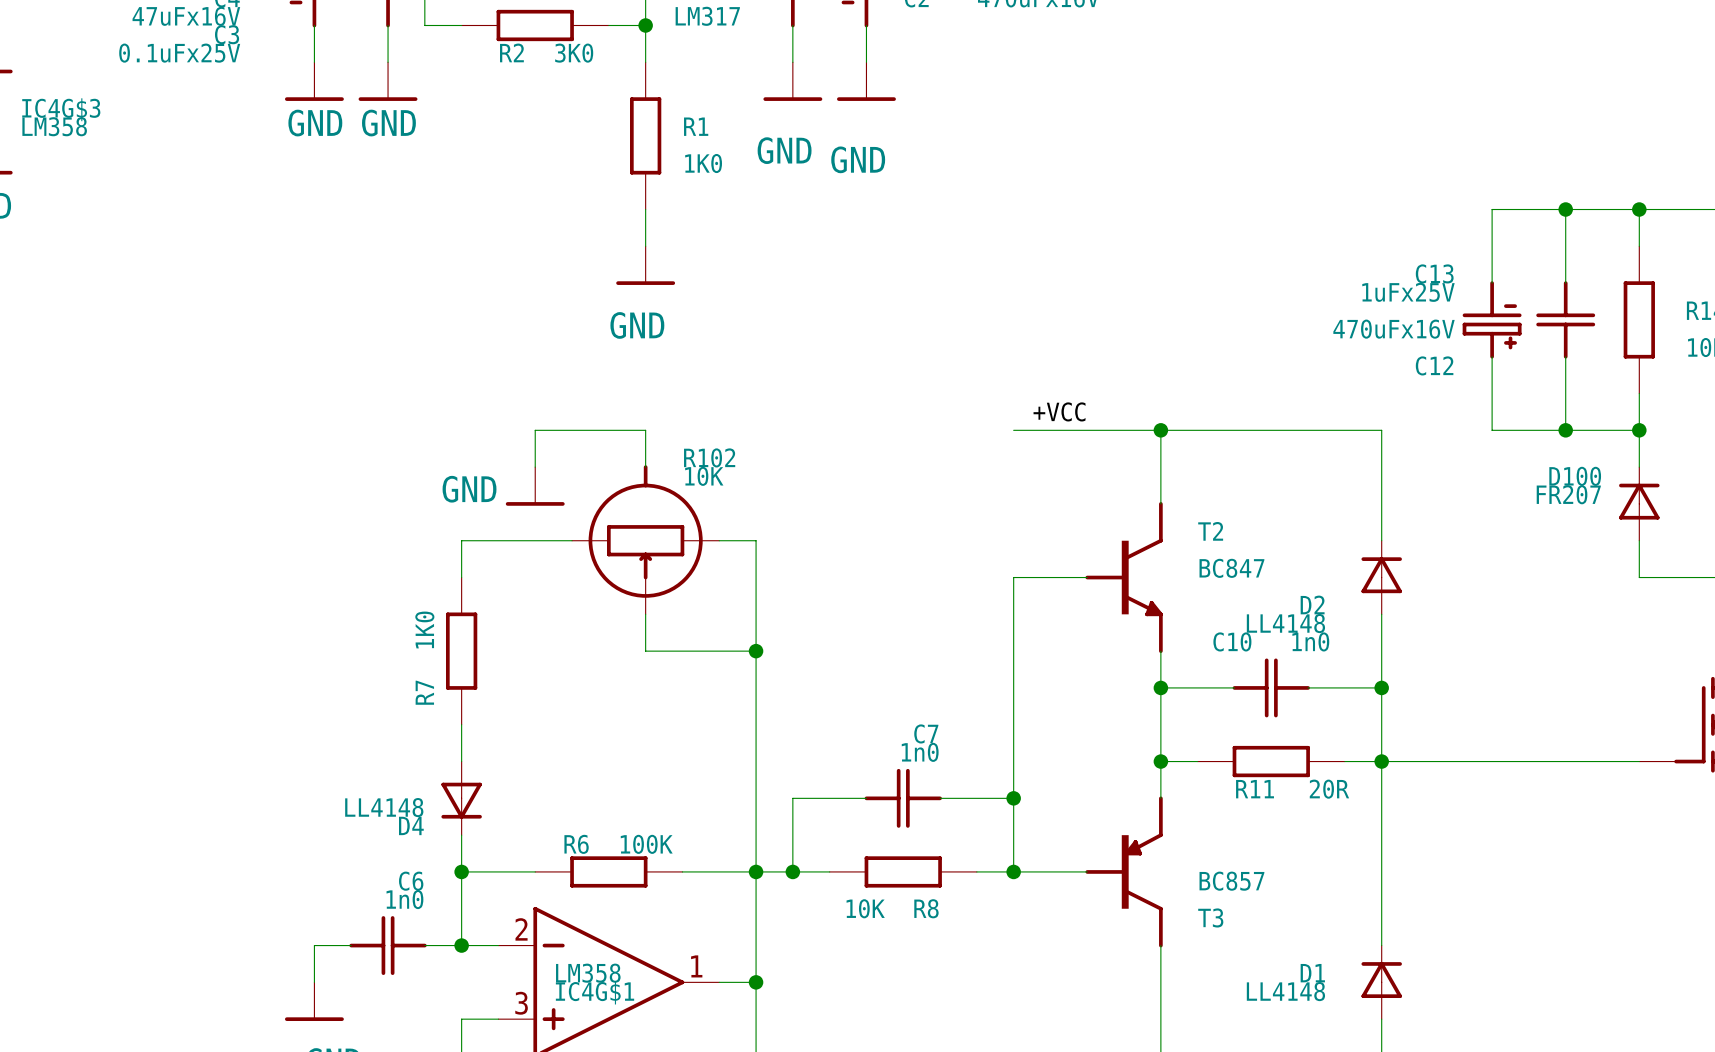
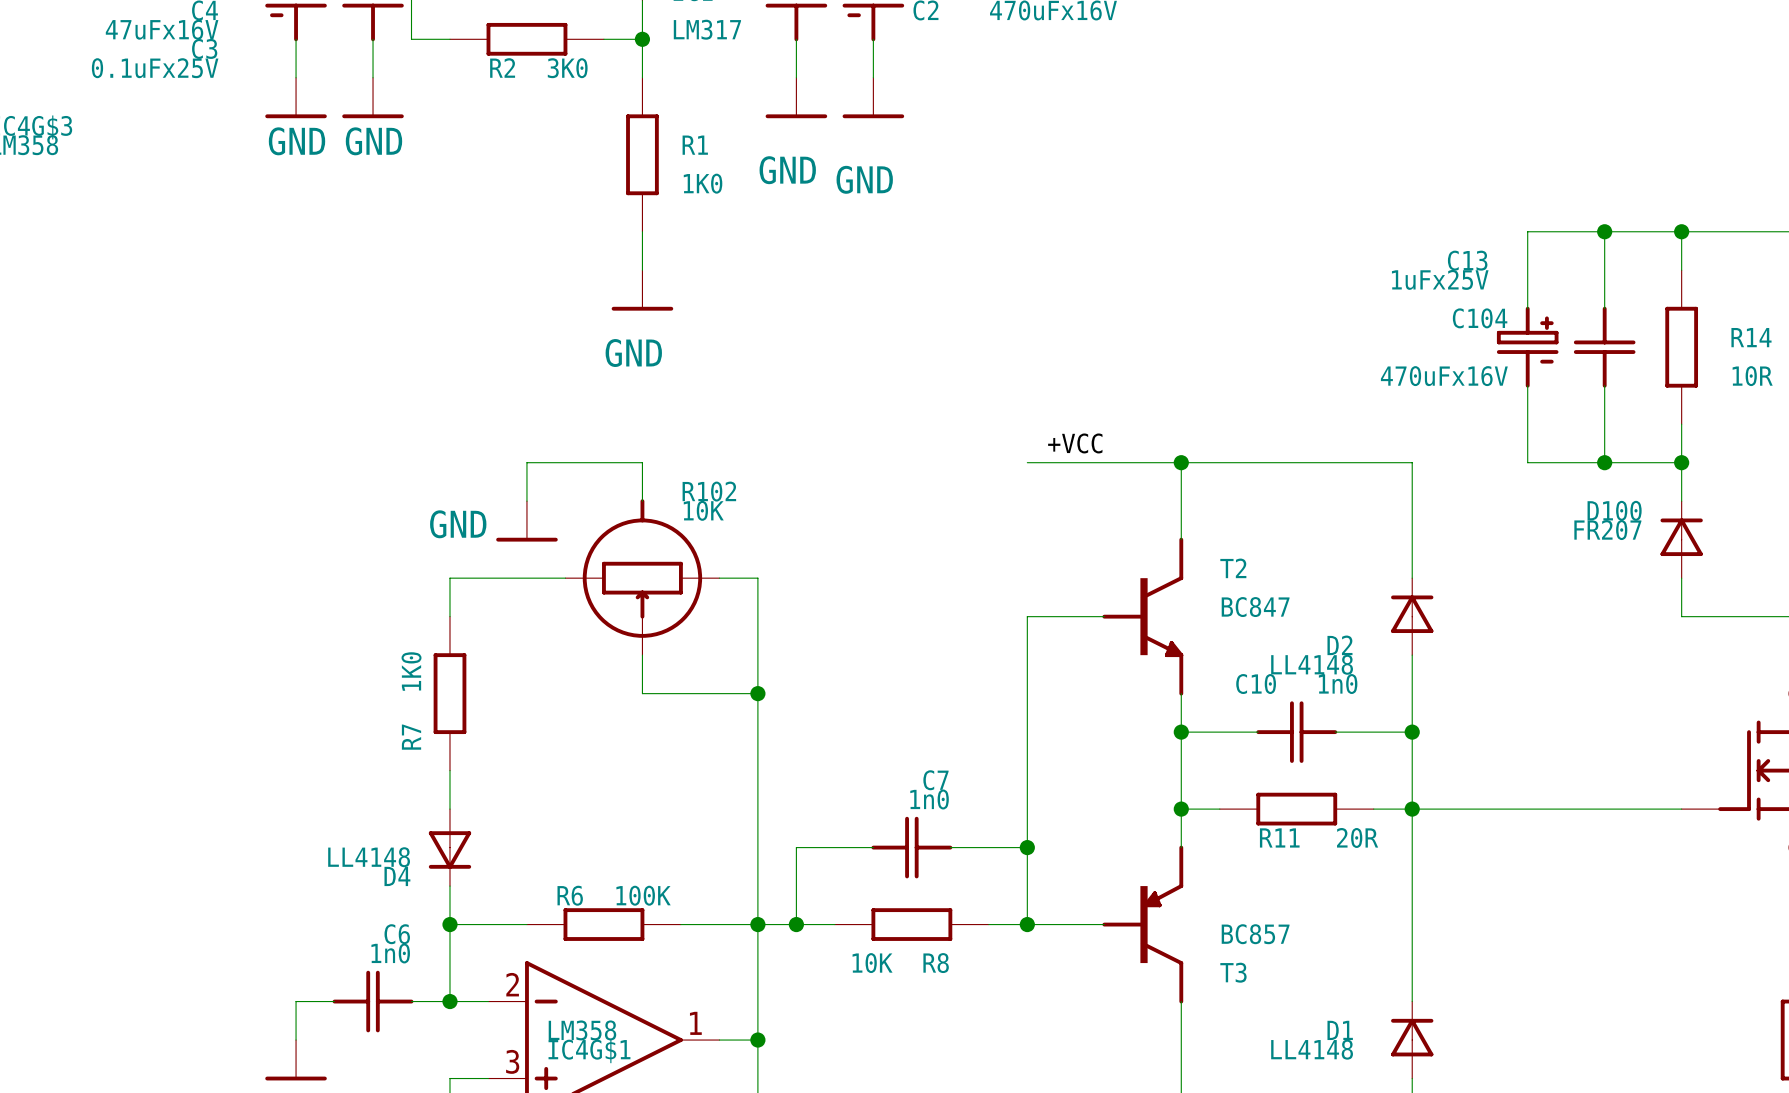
C13 name position: C13 (1434, 273) -> C13 (1467, 260)
C13 value position: 1uFx25V (1408, 292) -> 1uFx25V (1440, 279)
C12: 470uFx16V (1492, 319) -> none
C104: none -> 470uFx16V (1527, 347)

